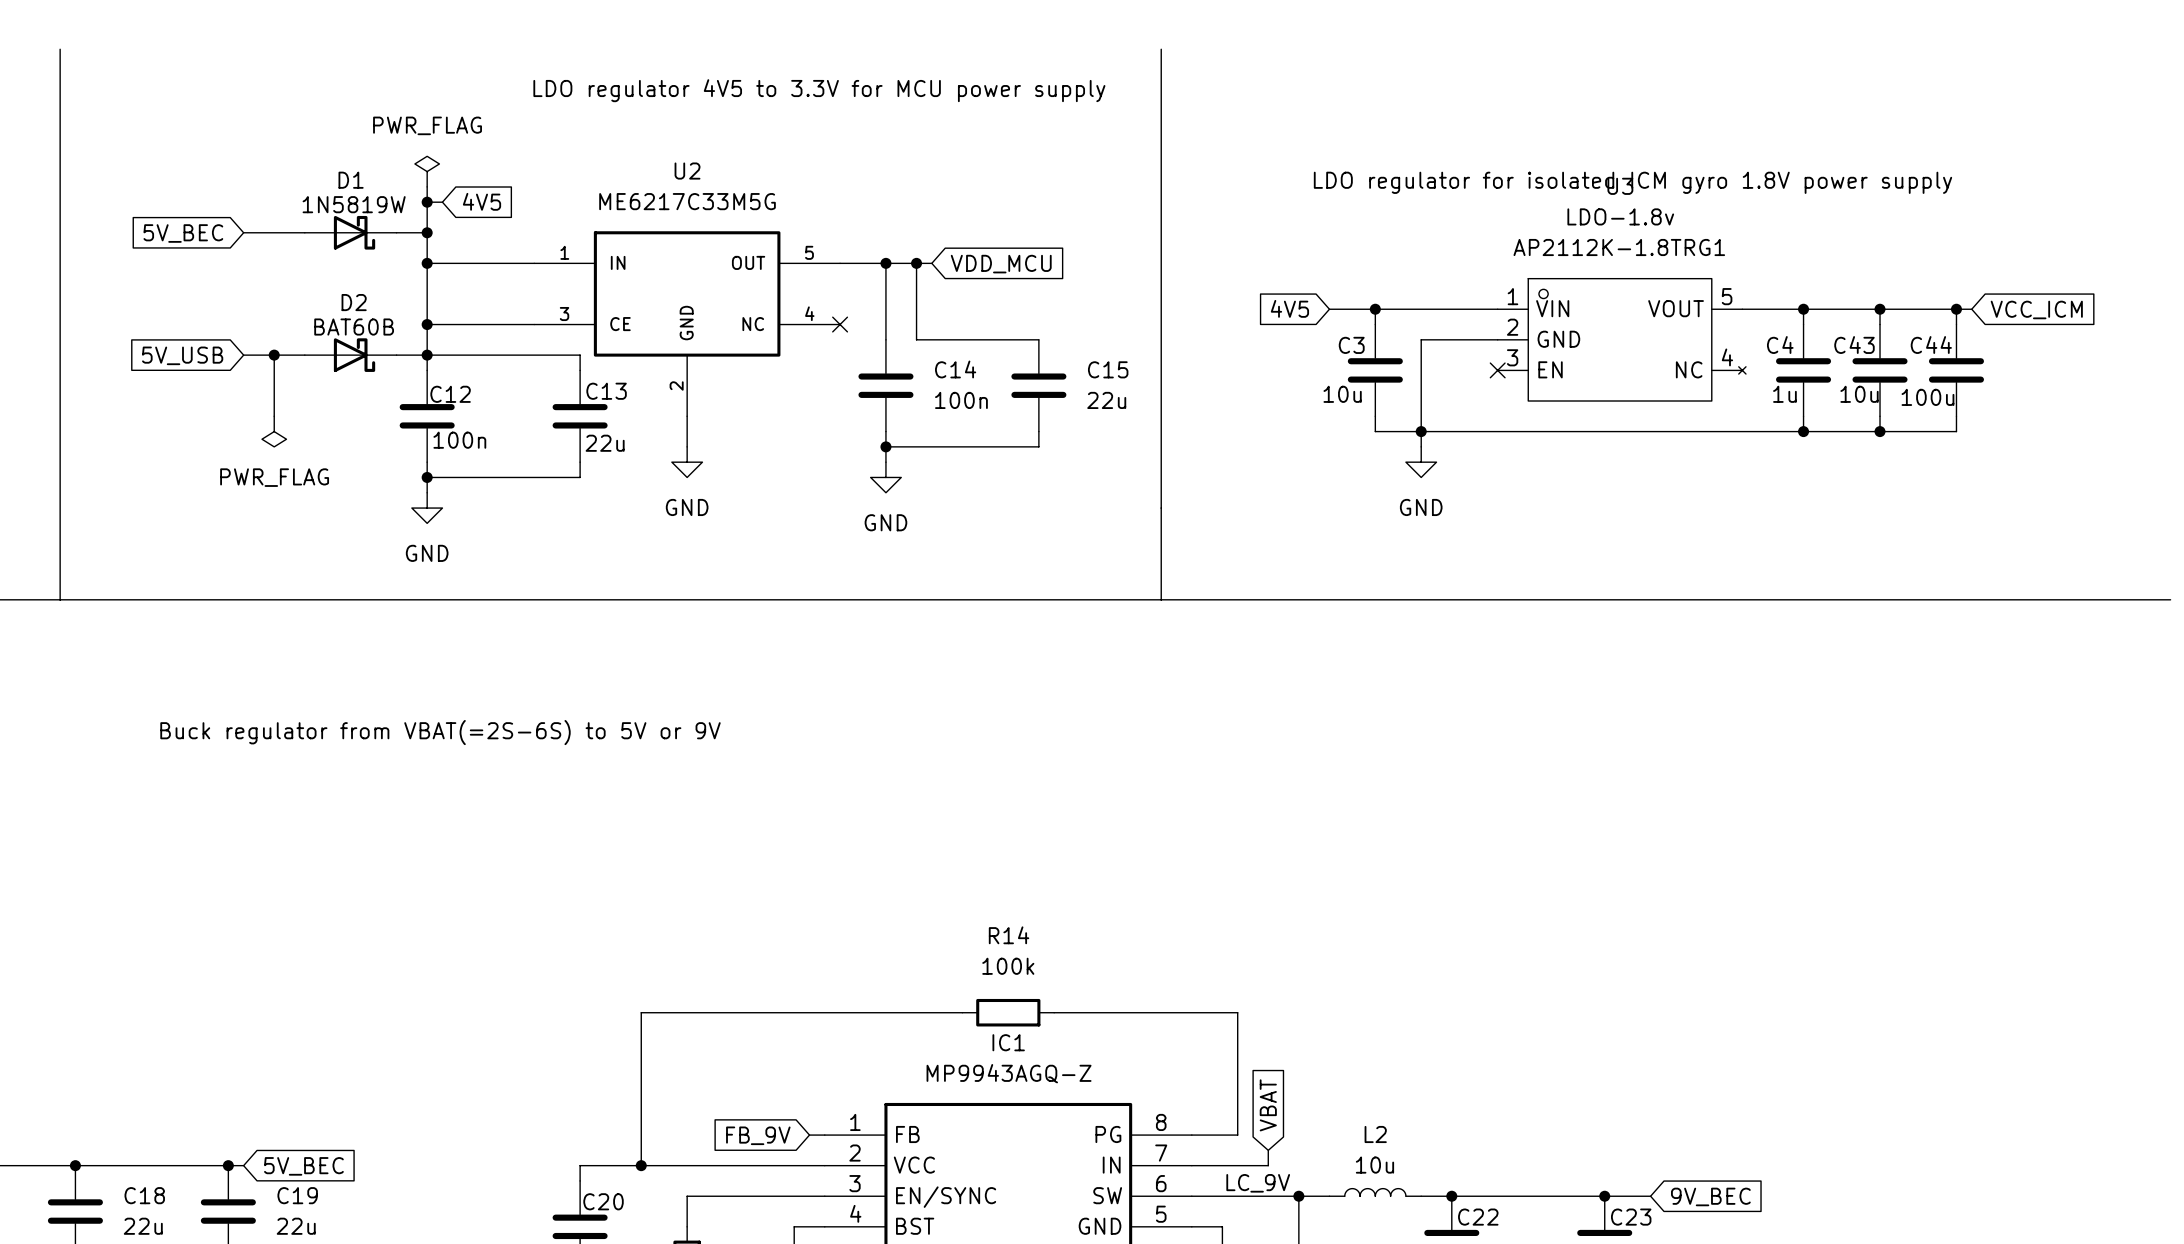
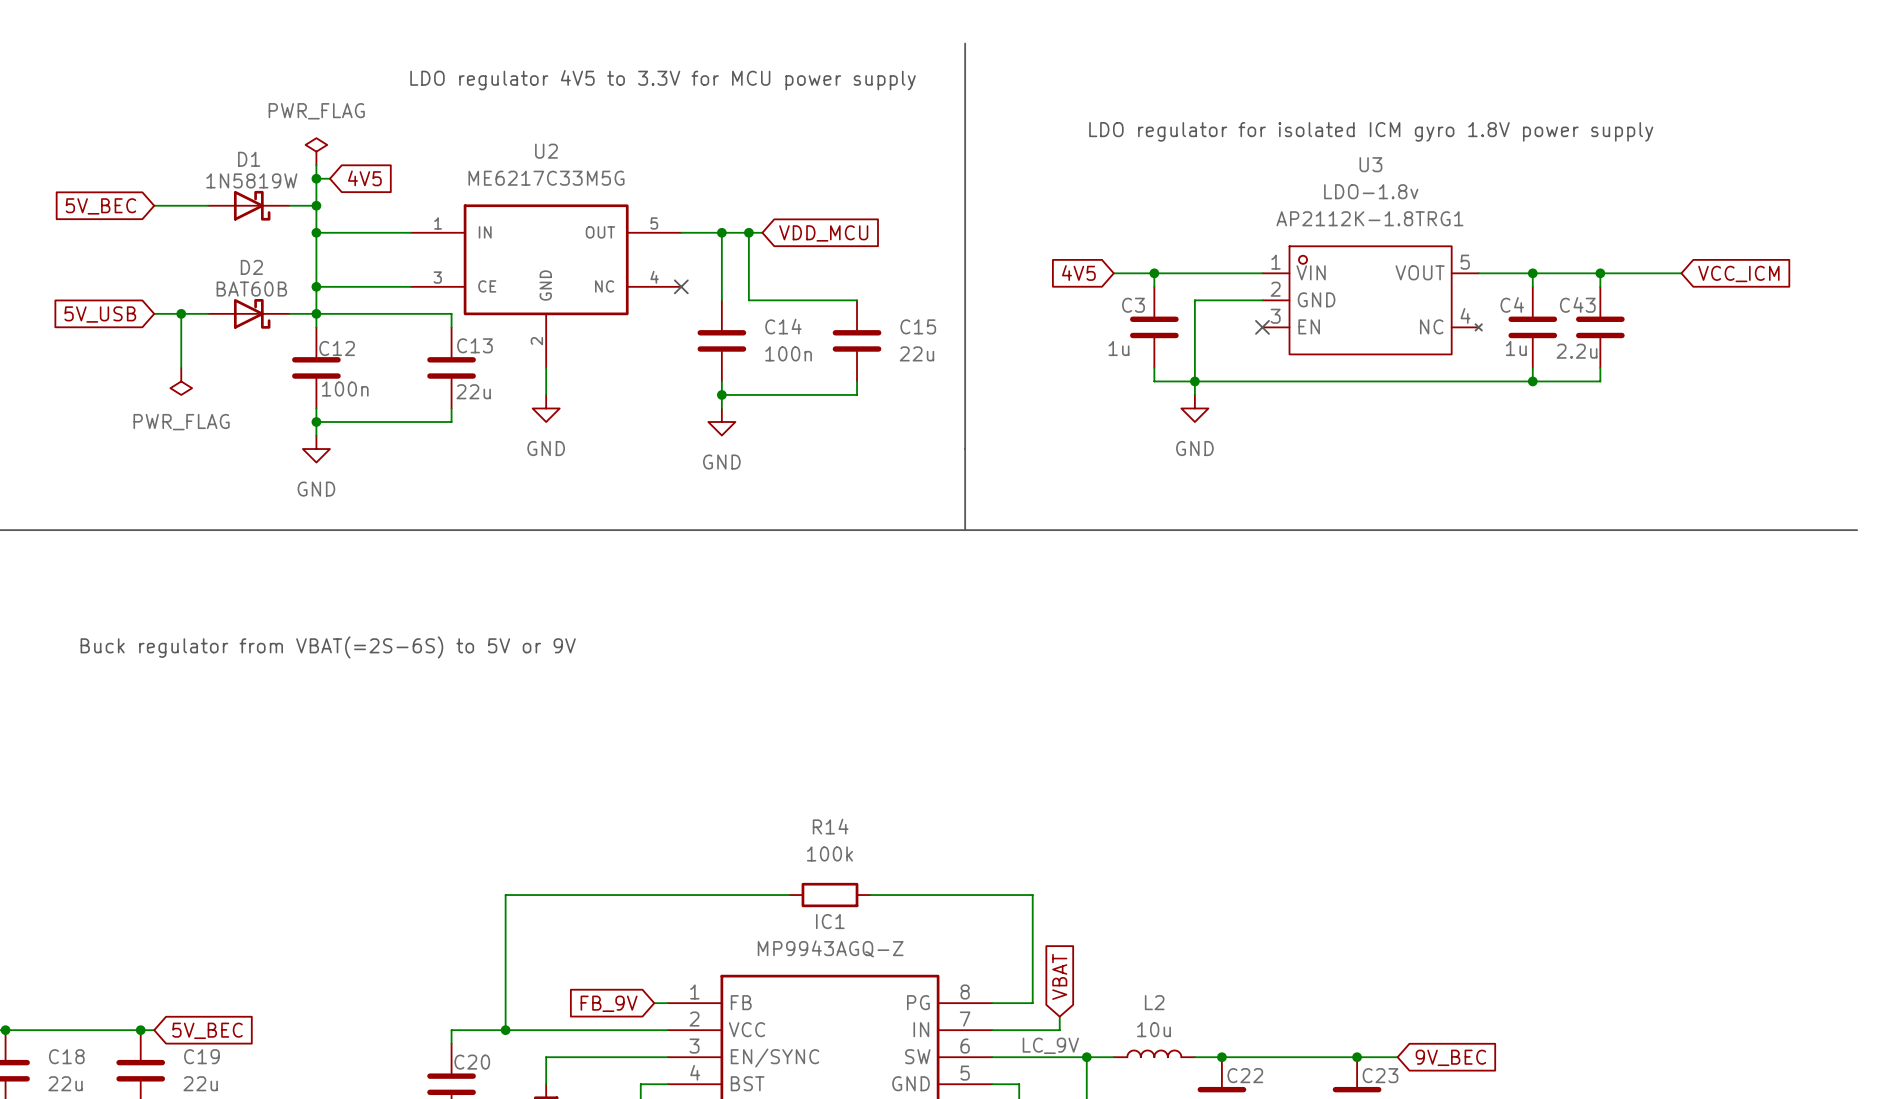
text position: LDO regulator for isolated ICM gyro 1.8V power supply (1632, 182) -> LDO regulator for isolated ICM gyro 1.8V power supply (1371, 131)
wire: (1956, 309) (1956, 324) -> none
junction: (1956, 309) -> none
C44: 100u (1956, 370) -> none
C3 value: 10u (1342, 394) -> 1u (1118, 348)
C43 value: 10u (1859, 394) -> 2.2u (1577, 351)
wire: (1956, 416) (1956, 431) (1880, 431) -> none
junction: (1880, 431) -> none

